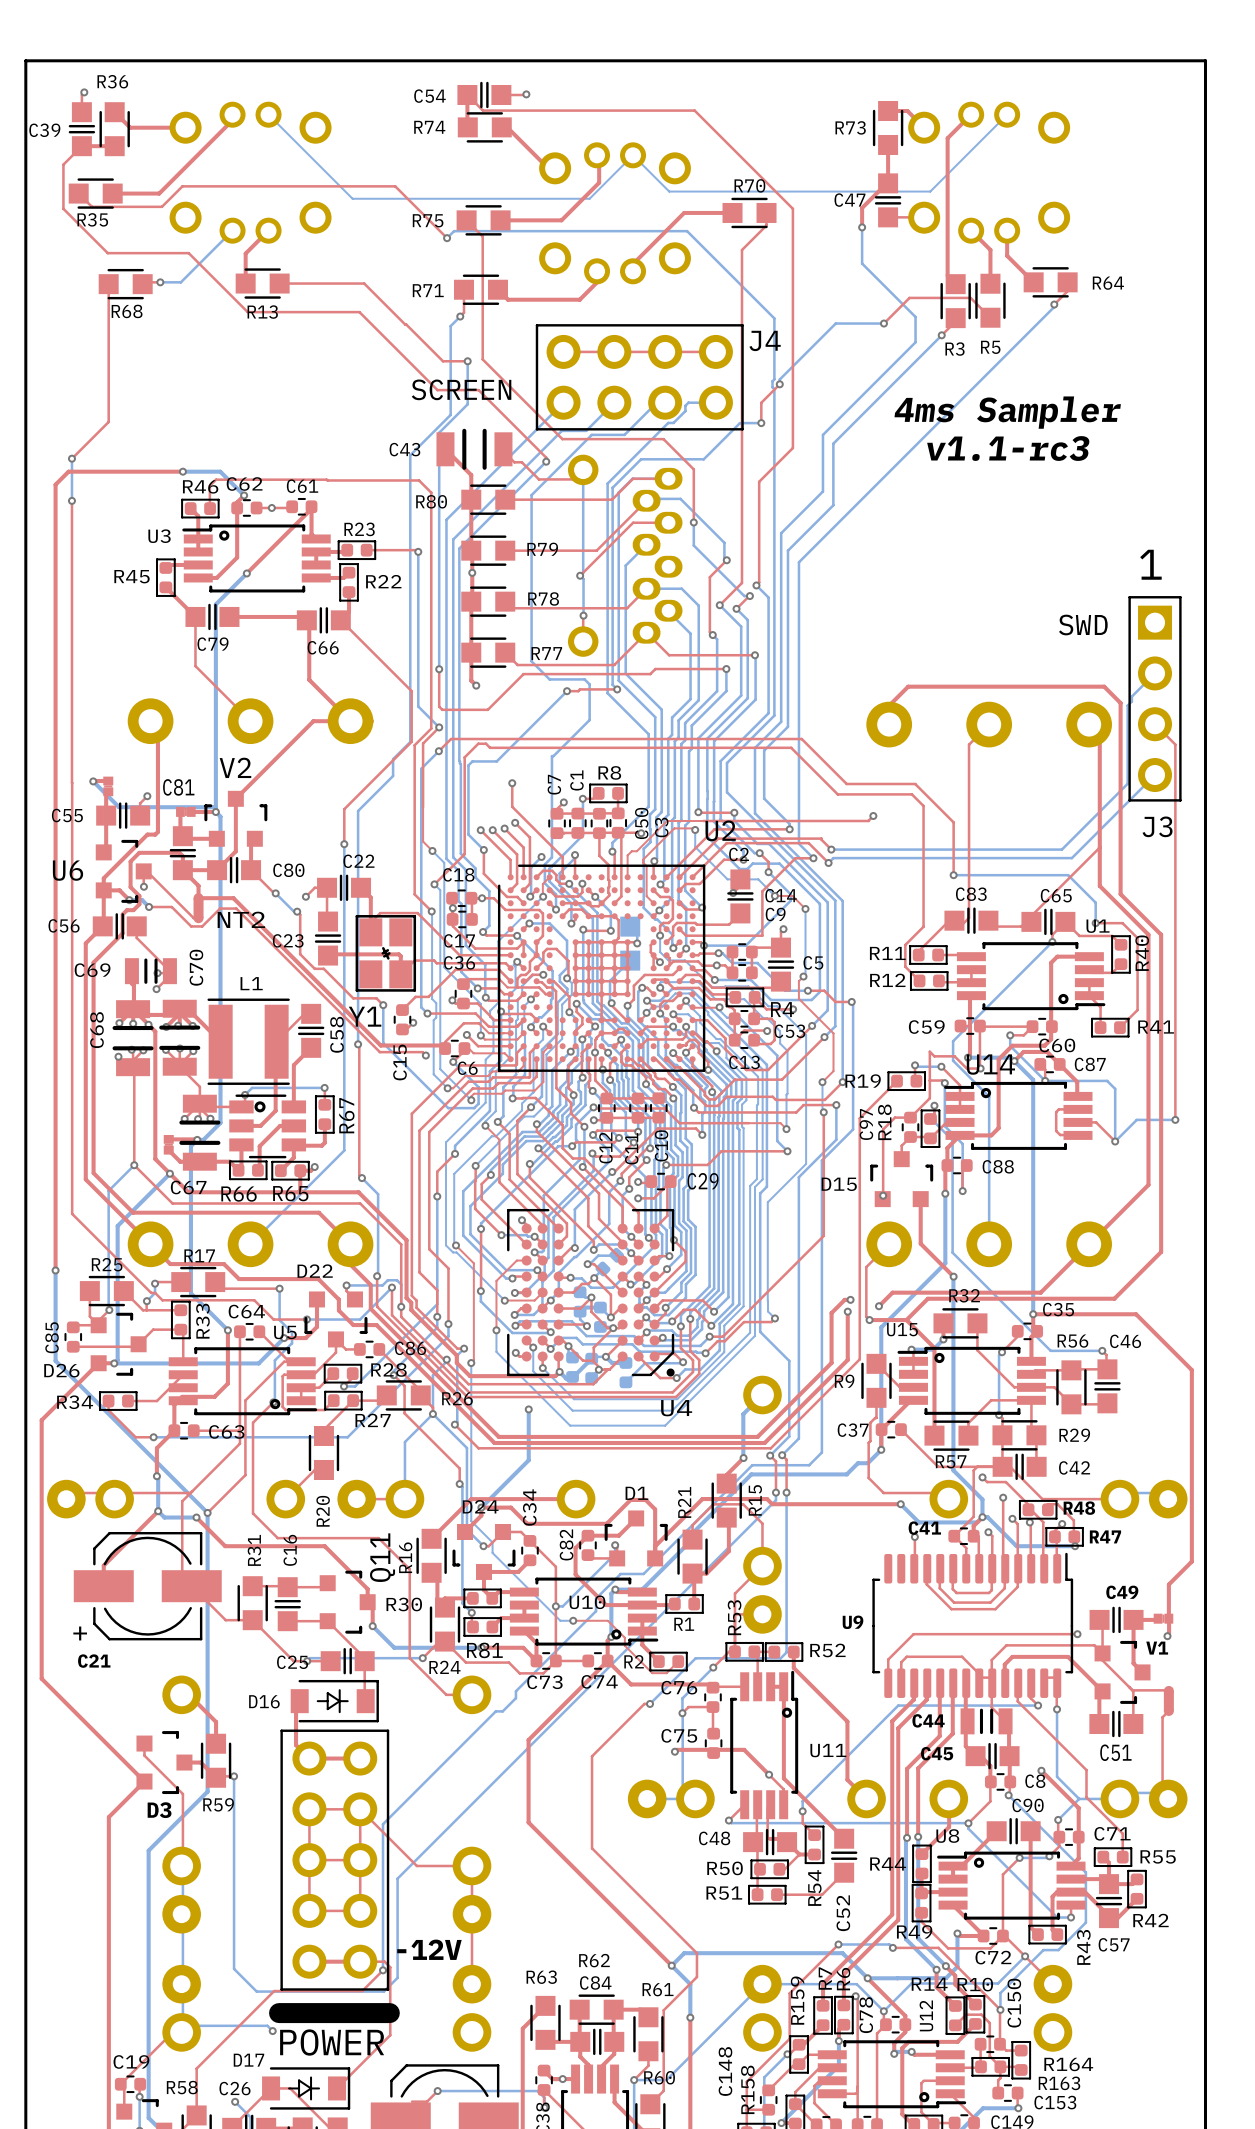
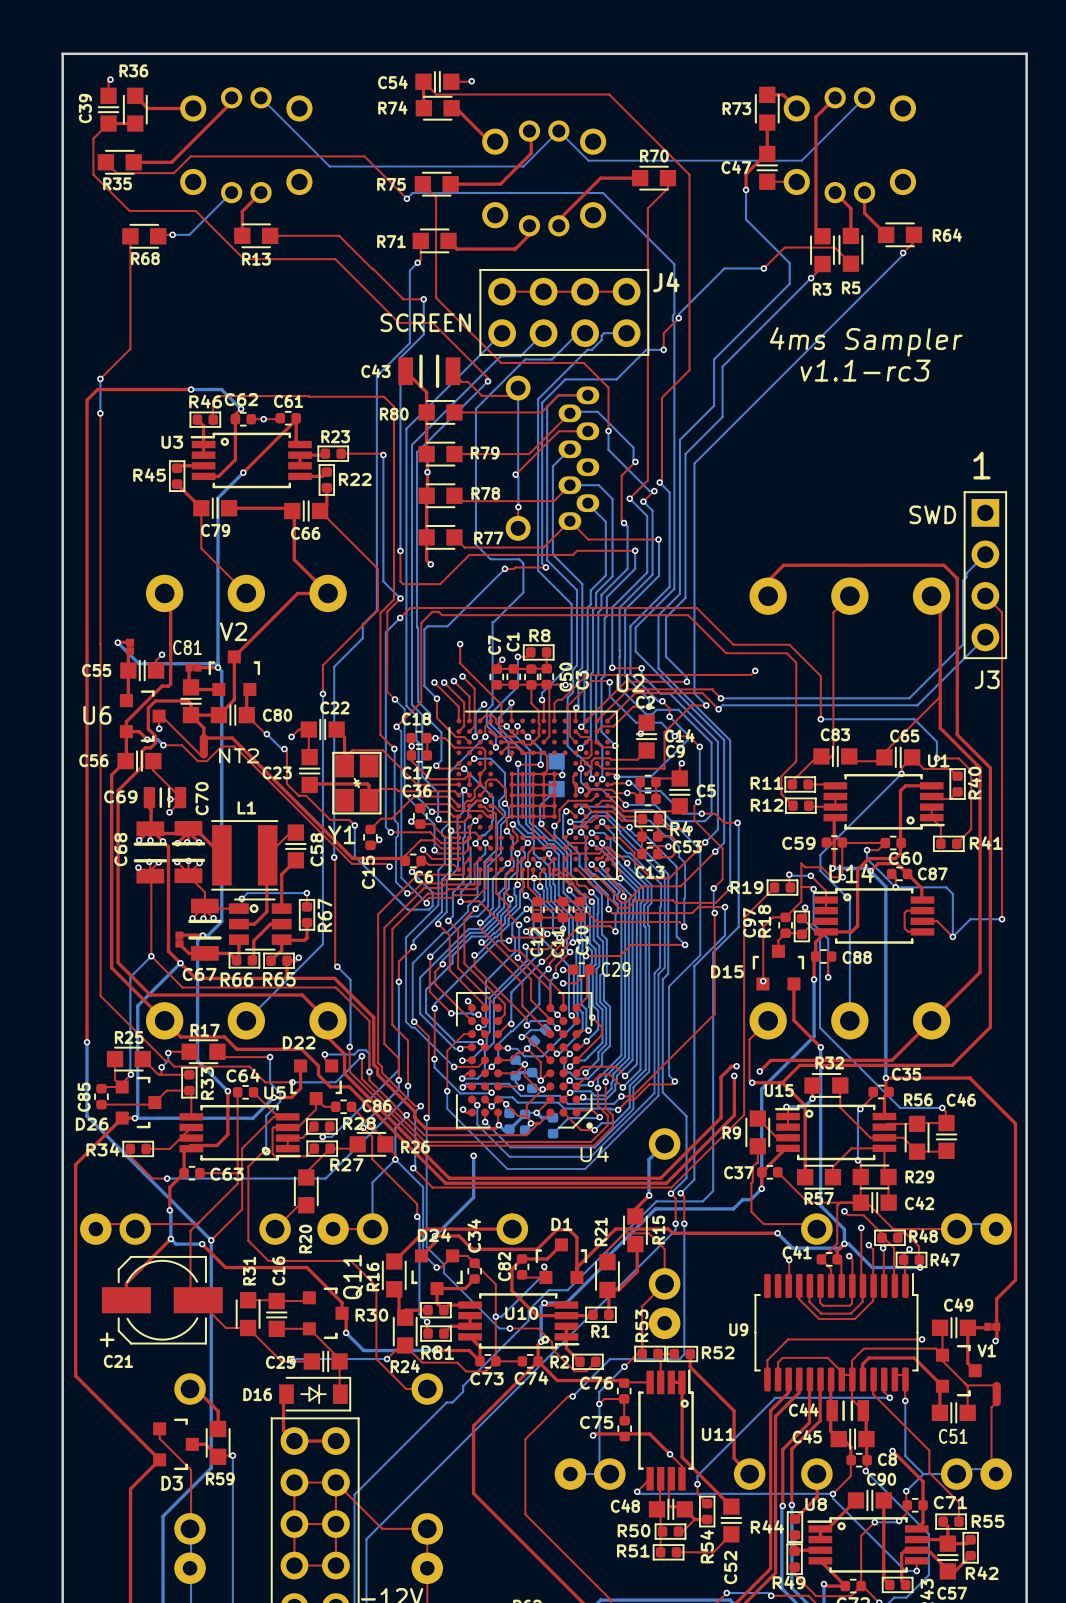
C39 name rotation: 0° (44, 130) -> 90° counterclockwise (85, 108)

